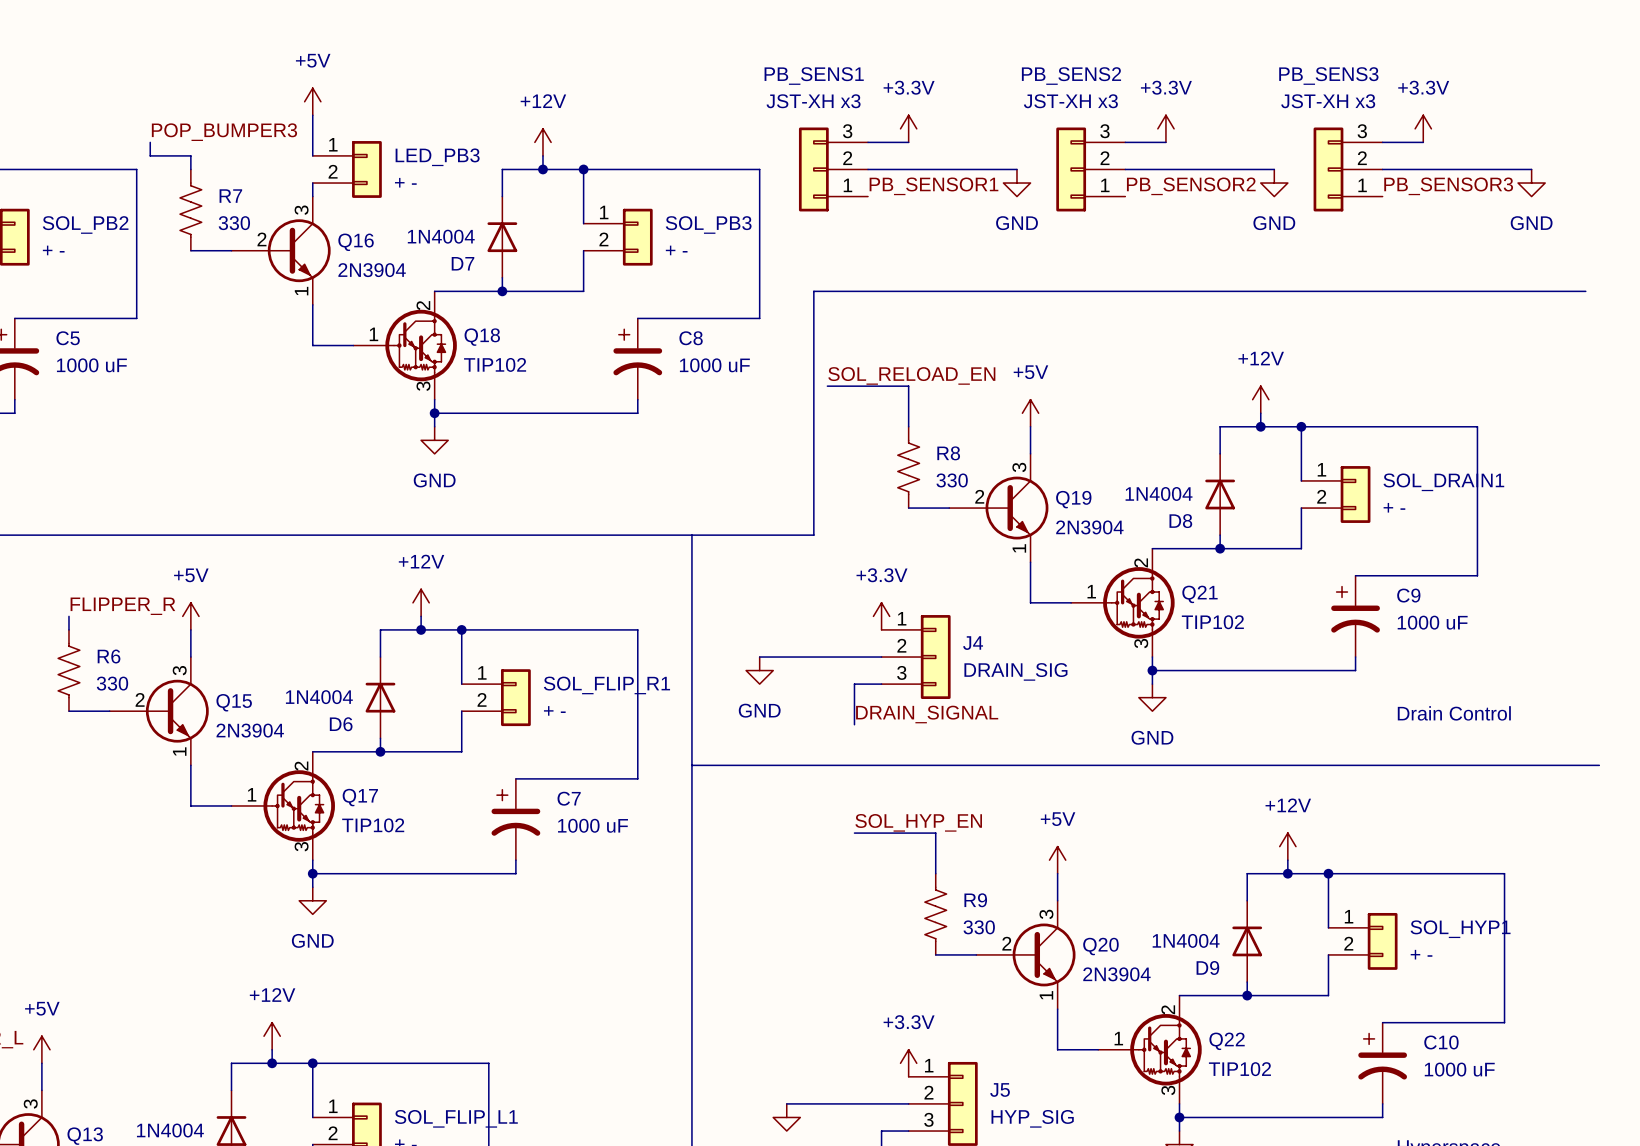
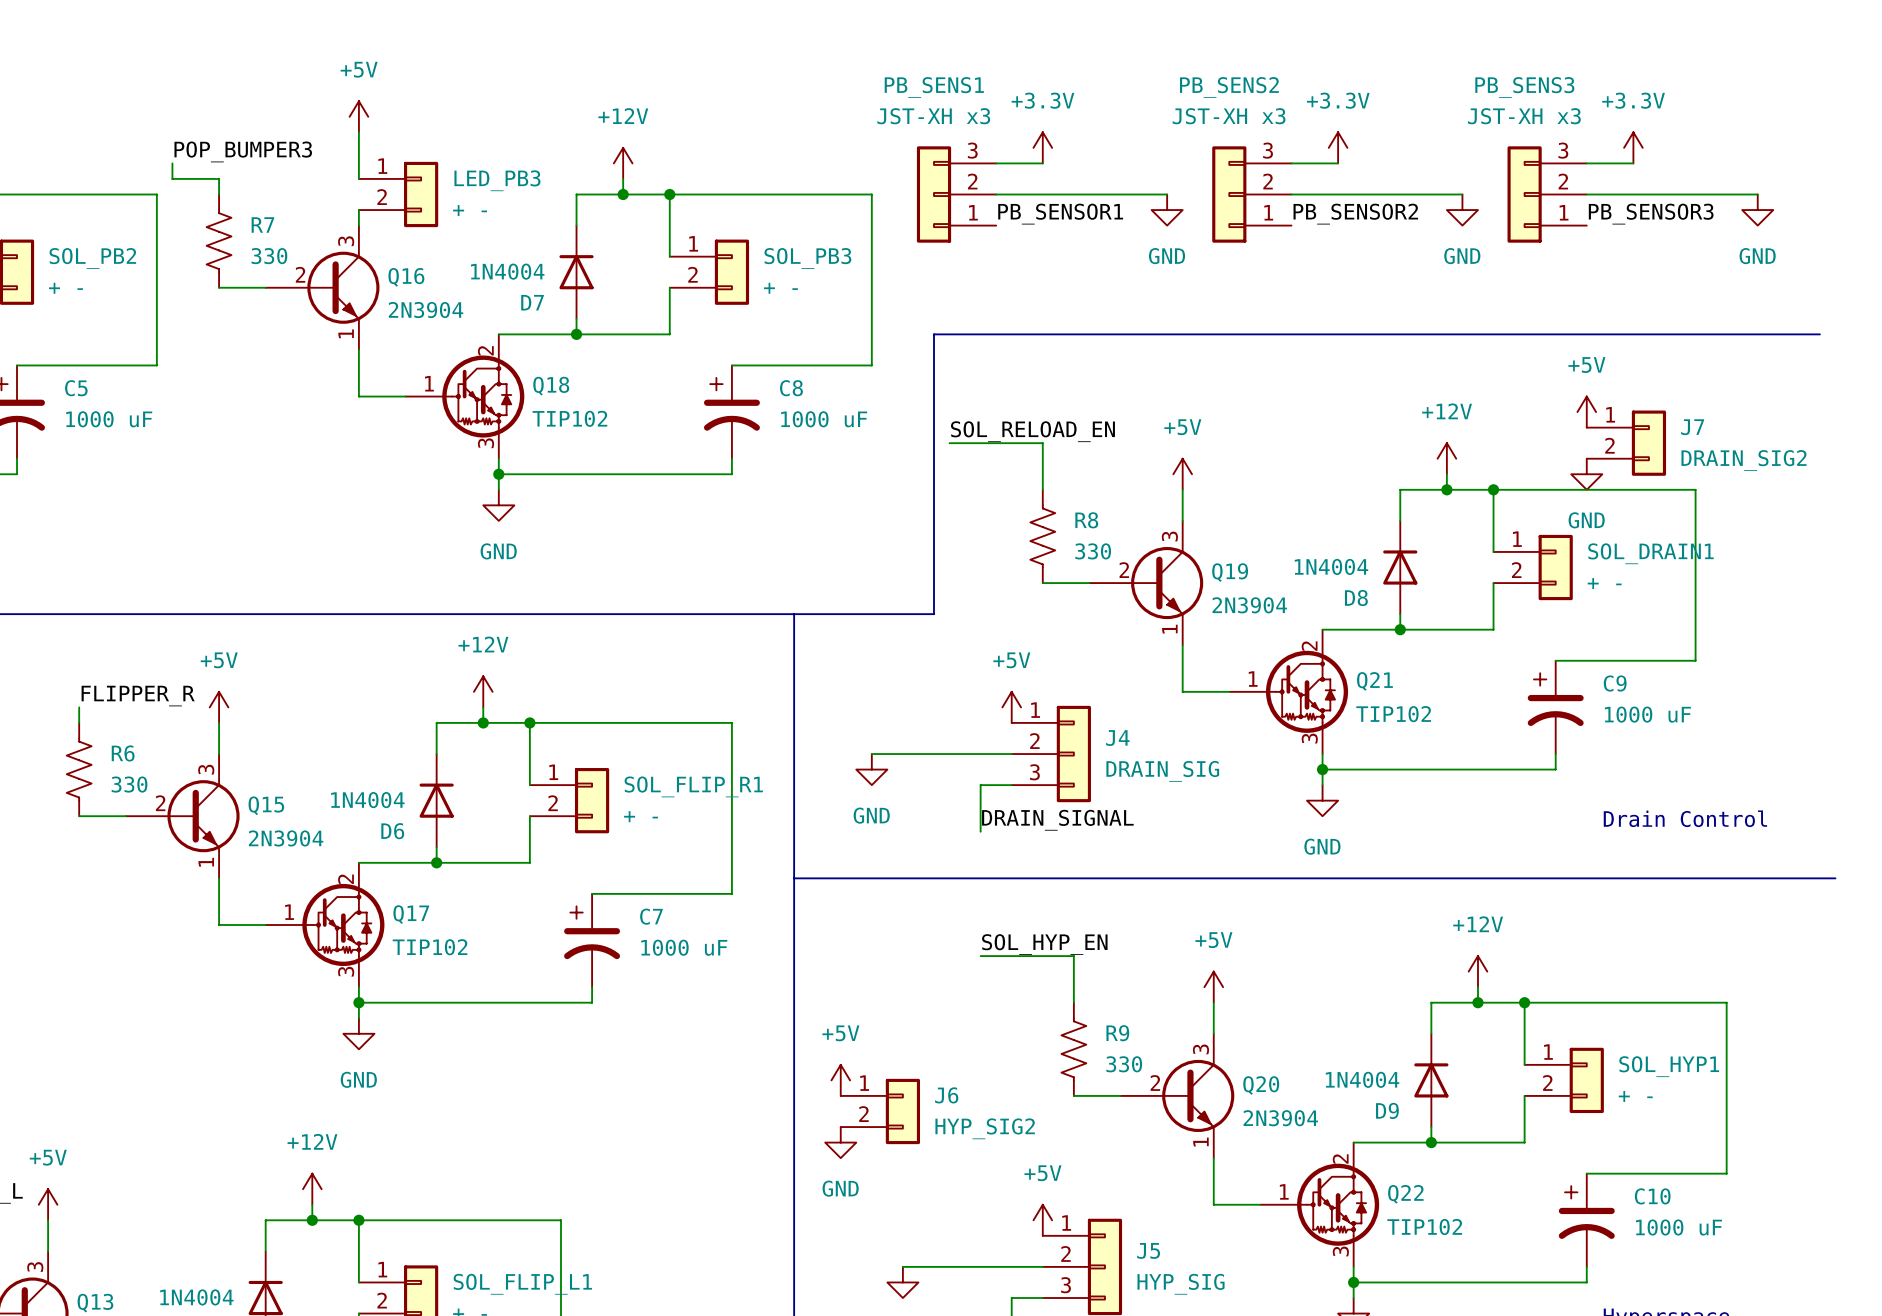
power symbol: none -> +5V (1586, 412)
J7: none -> DRAIN_SIG2 (1626, 443)
power symbol: none -> GND (1586, 474)
power symbol: +3.3V (881, 616) -> +5V (1011, 707)
power symbol: none -> +5V (840, 1080)
J6: none -> HYP_SIG2 (880, 1111)
power symbol: none -> GND (840, 1142)
power symbol: +3.3V (908, 1063) -> +5V (1042, 1220)

